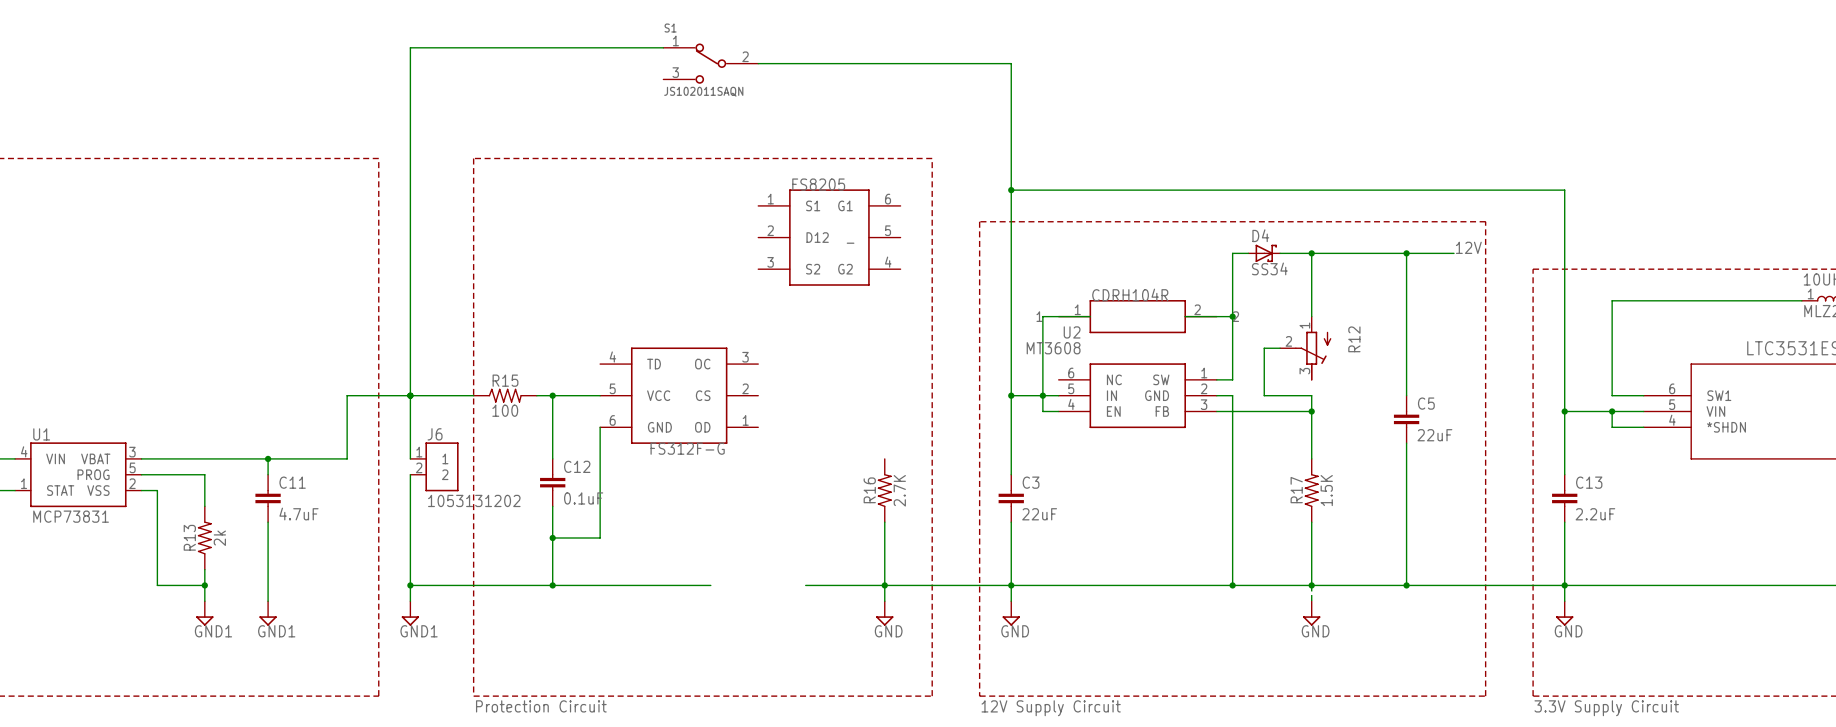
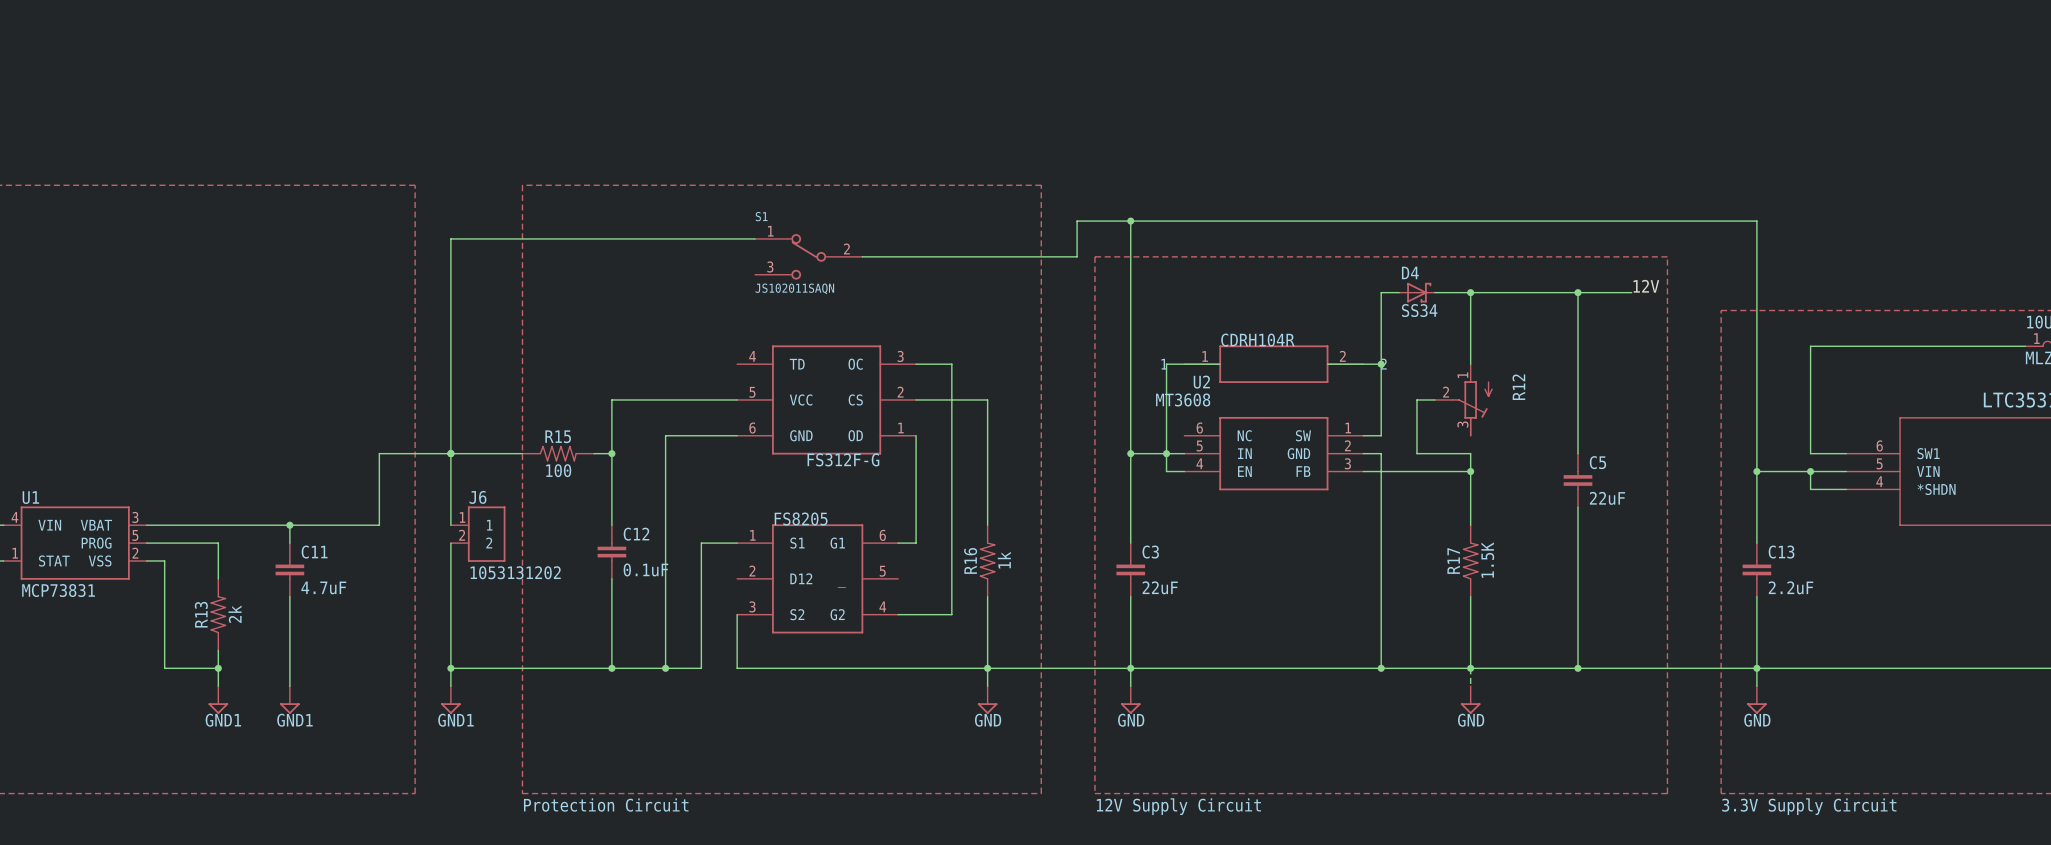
wire: (663, 47) (410, 47) (410, 205) -> (755, 238) (450, 238)
S1 position: (710, 63) -> (808, 256)
wire: (758, 63) (1011, 63) (1011, 190) -> (862, 256) (1077, 256) (1077, 221) (1130, 221)
part: (829, 237) -> none
wire: none -> (916, 364) (951, 364) (951, 614) (898, 614)
wire: none -> (916, 399) (987, 399) (987, 525)
wire: none -> (737, 435) (665, 435) (665, 489)
wire: none -> (916, 435) (916, 543) (898, 543)
wire: (552, 395) (600, 395) -> (611, 453) (611, 399) (737, 399)
part position: (679, 395) -> (826, 399)
wire: none -> (737, 543) (701, 543) (701, 668)
R16 value: 2.7K (899, 490) -> 1k (1004, 560)
part: none -> (817, 578)
wire: (552, 538) (600, 538) -> (665, 668) (665, 614)
junction: (552, 538) -> none
junction: none -> (665, 668)
wire: (631, 585) (663, 585) -> (737, 614) (737, 668)
wire: none -> (790, 668) (898, 668)

